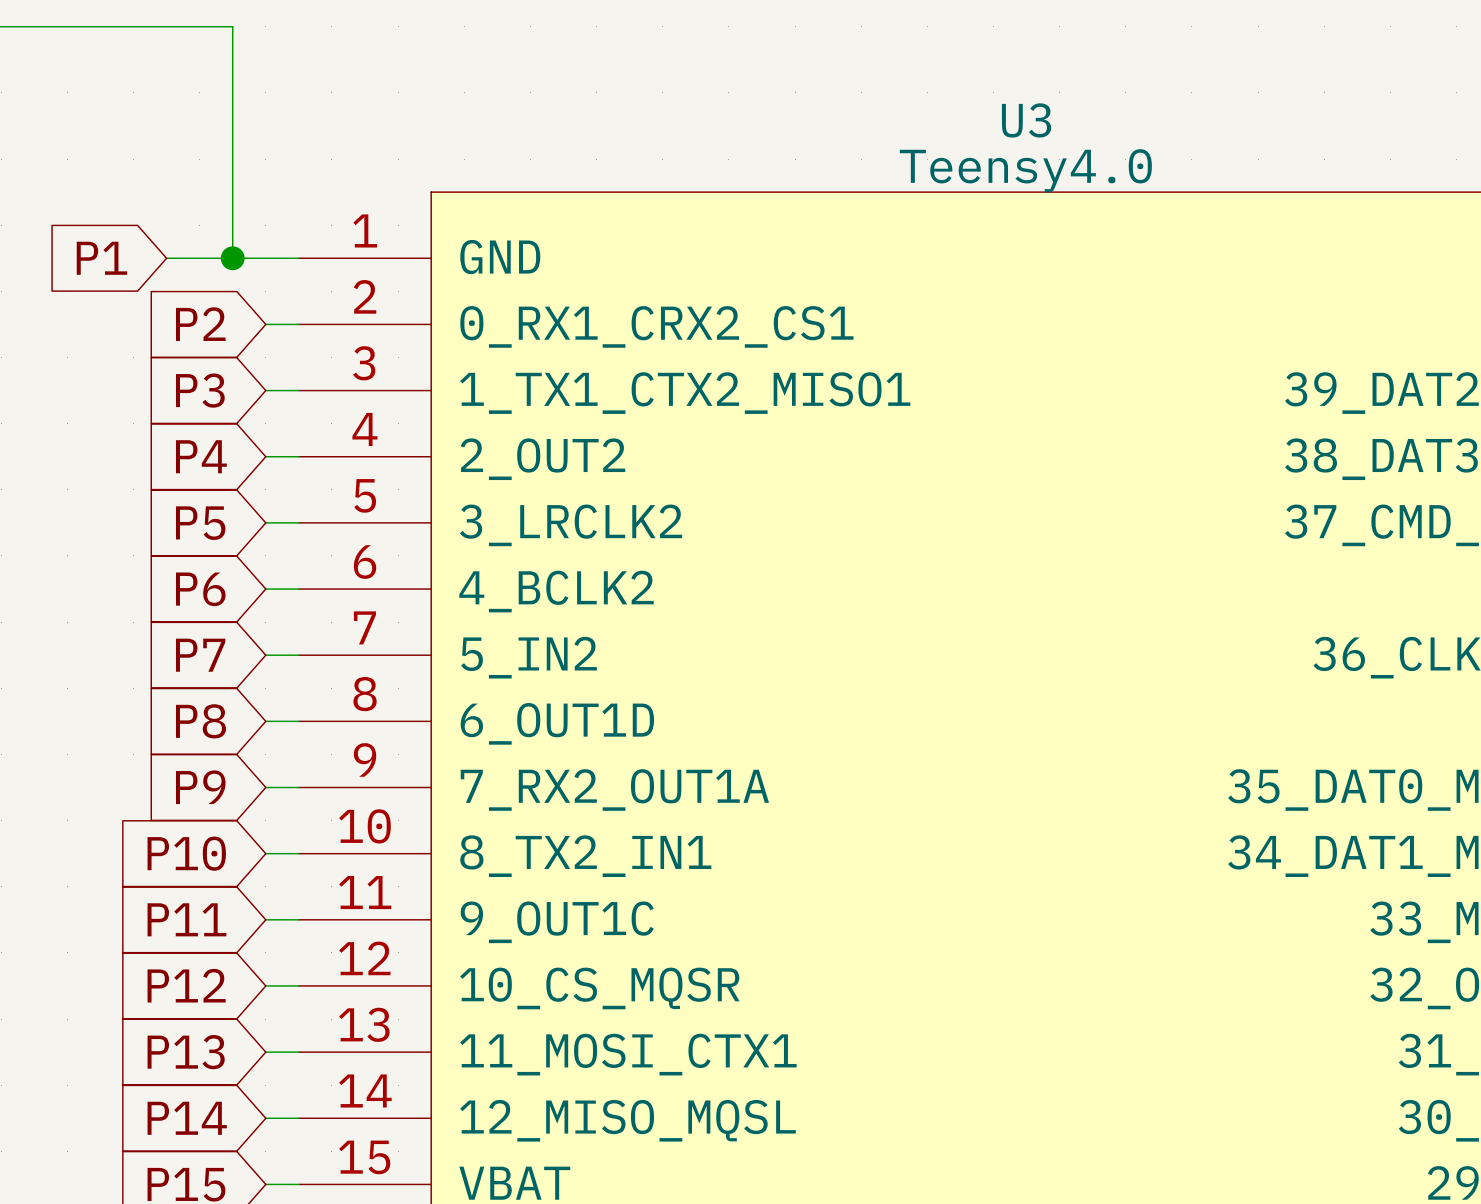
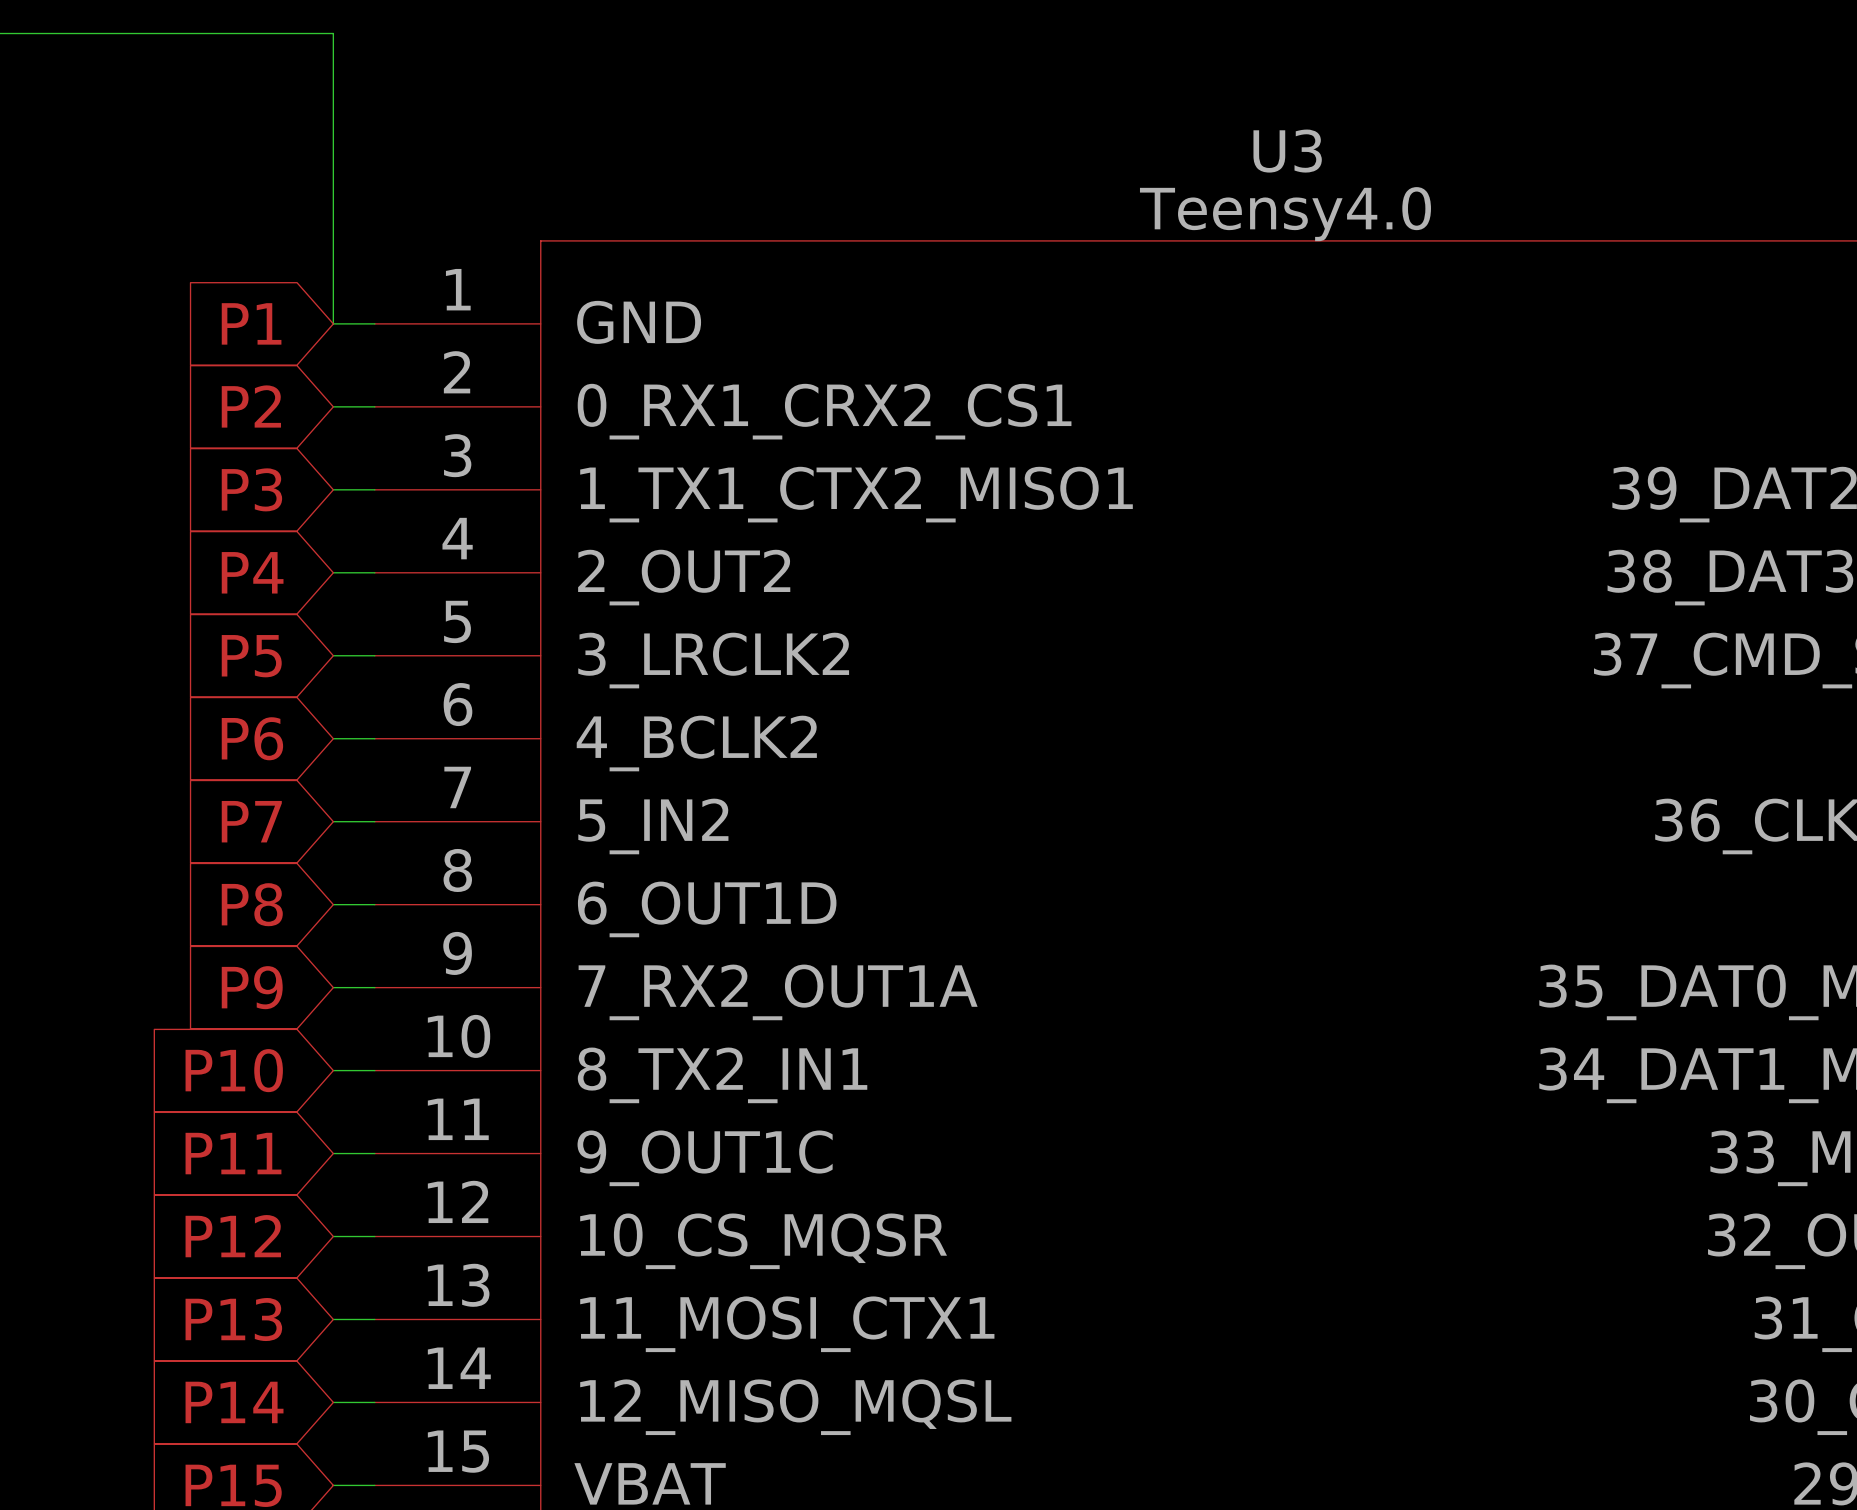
wire: (232, 26) (232, 258) -> (291, 33) (333, 33) (333, 323)
global label position: P1 (101, 258) -> P1 (251, 323)
wire: (166, 258) (265, 258) -> none
junction: (232, 258) -> none

